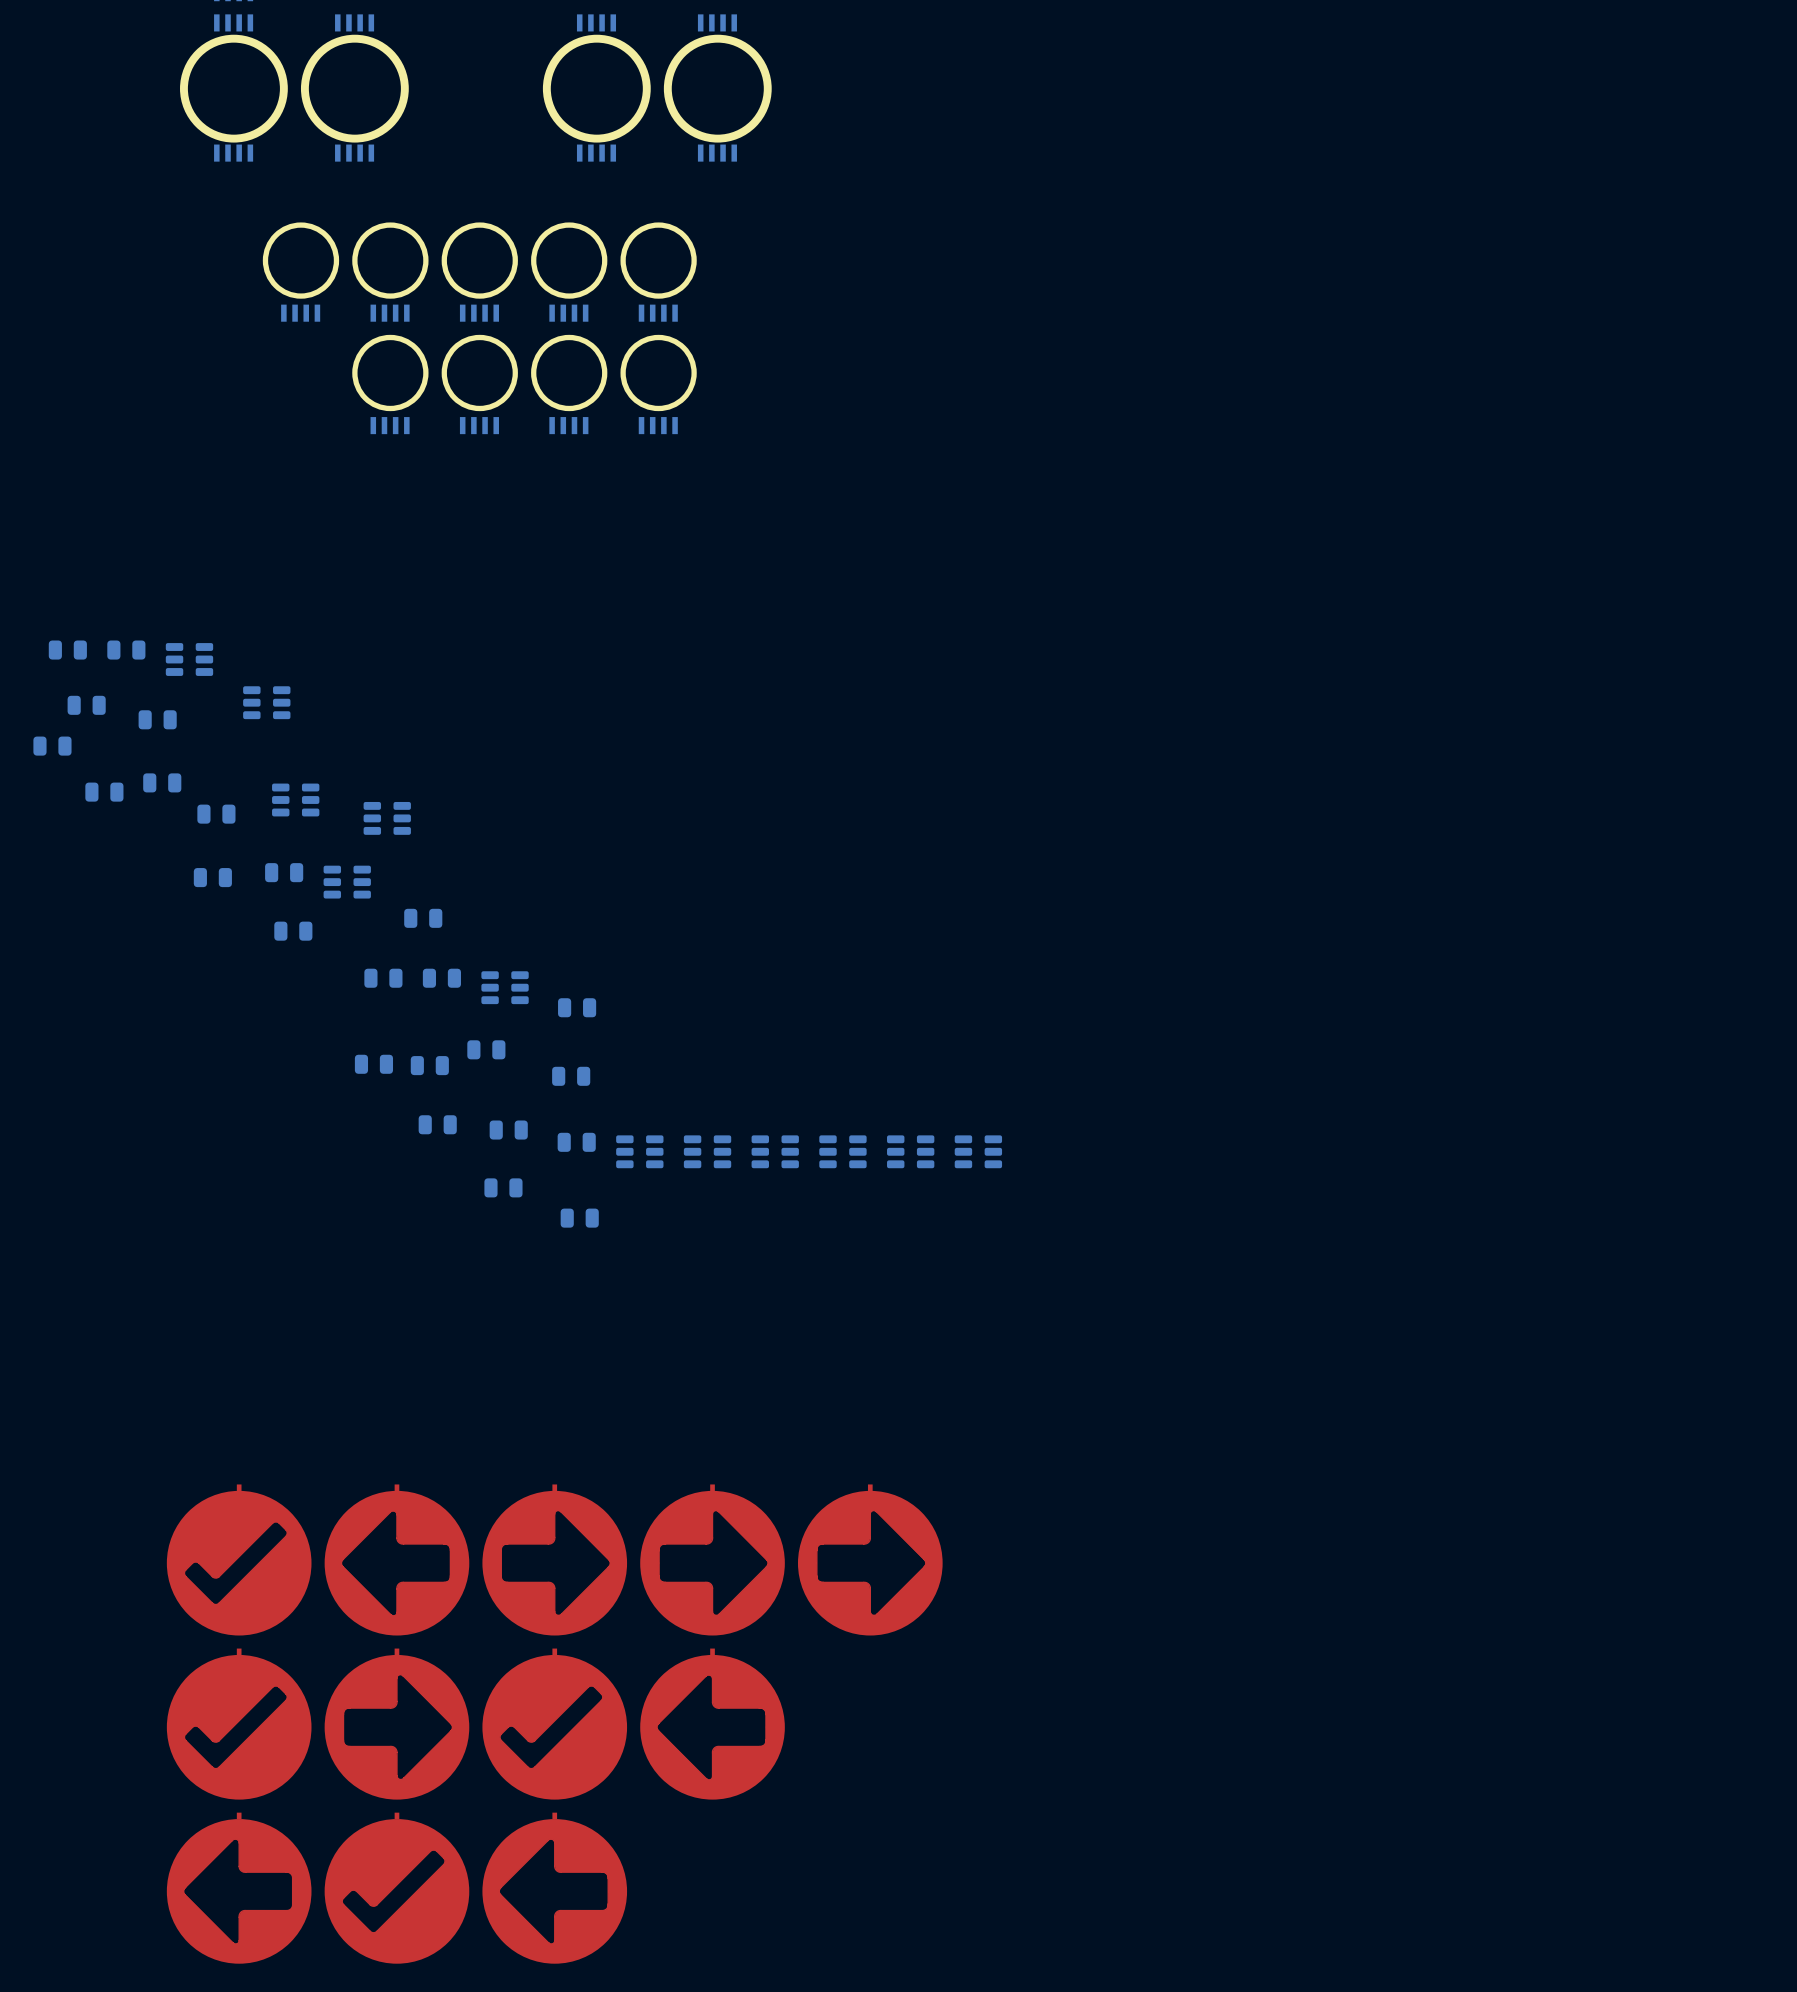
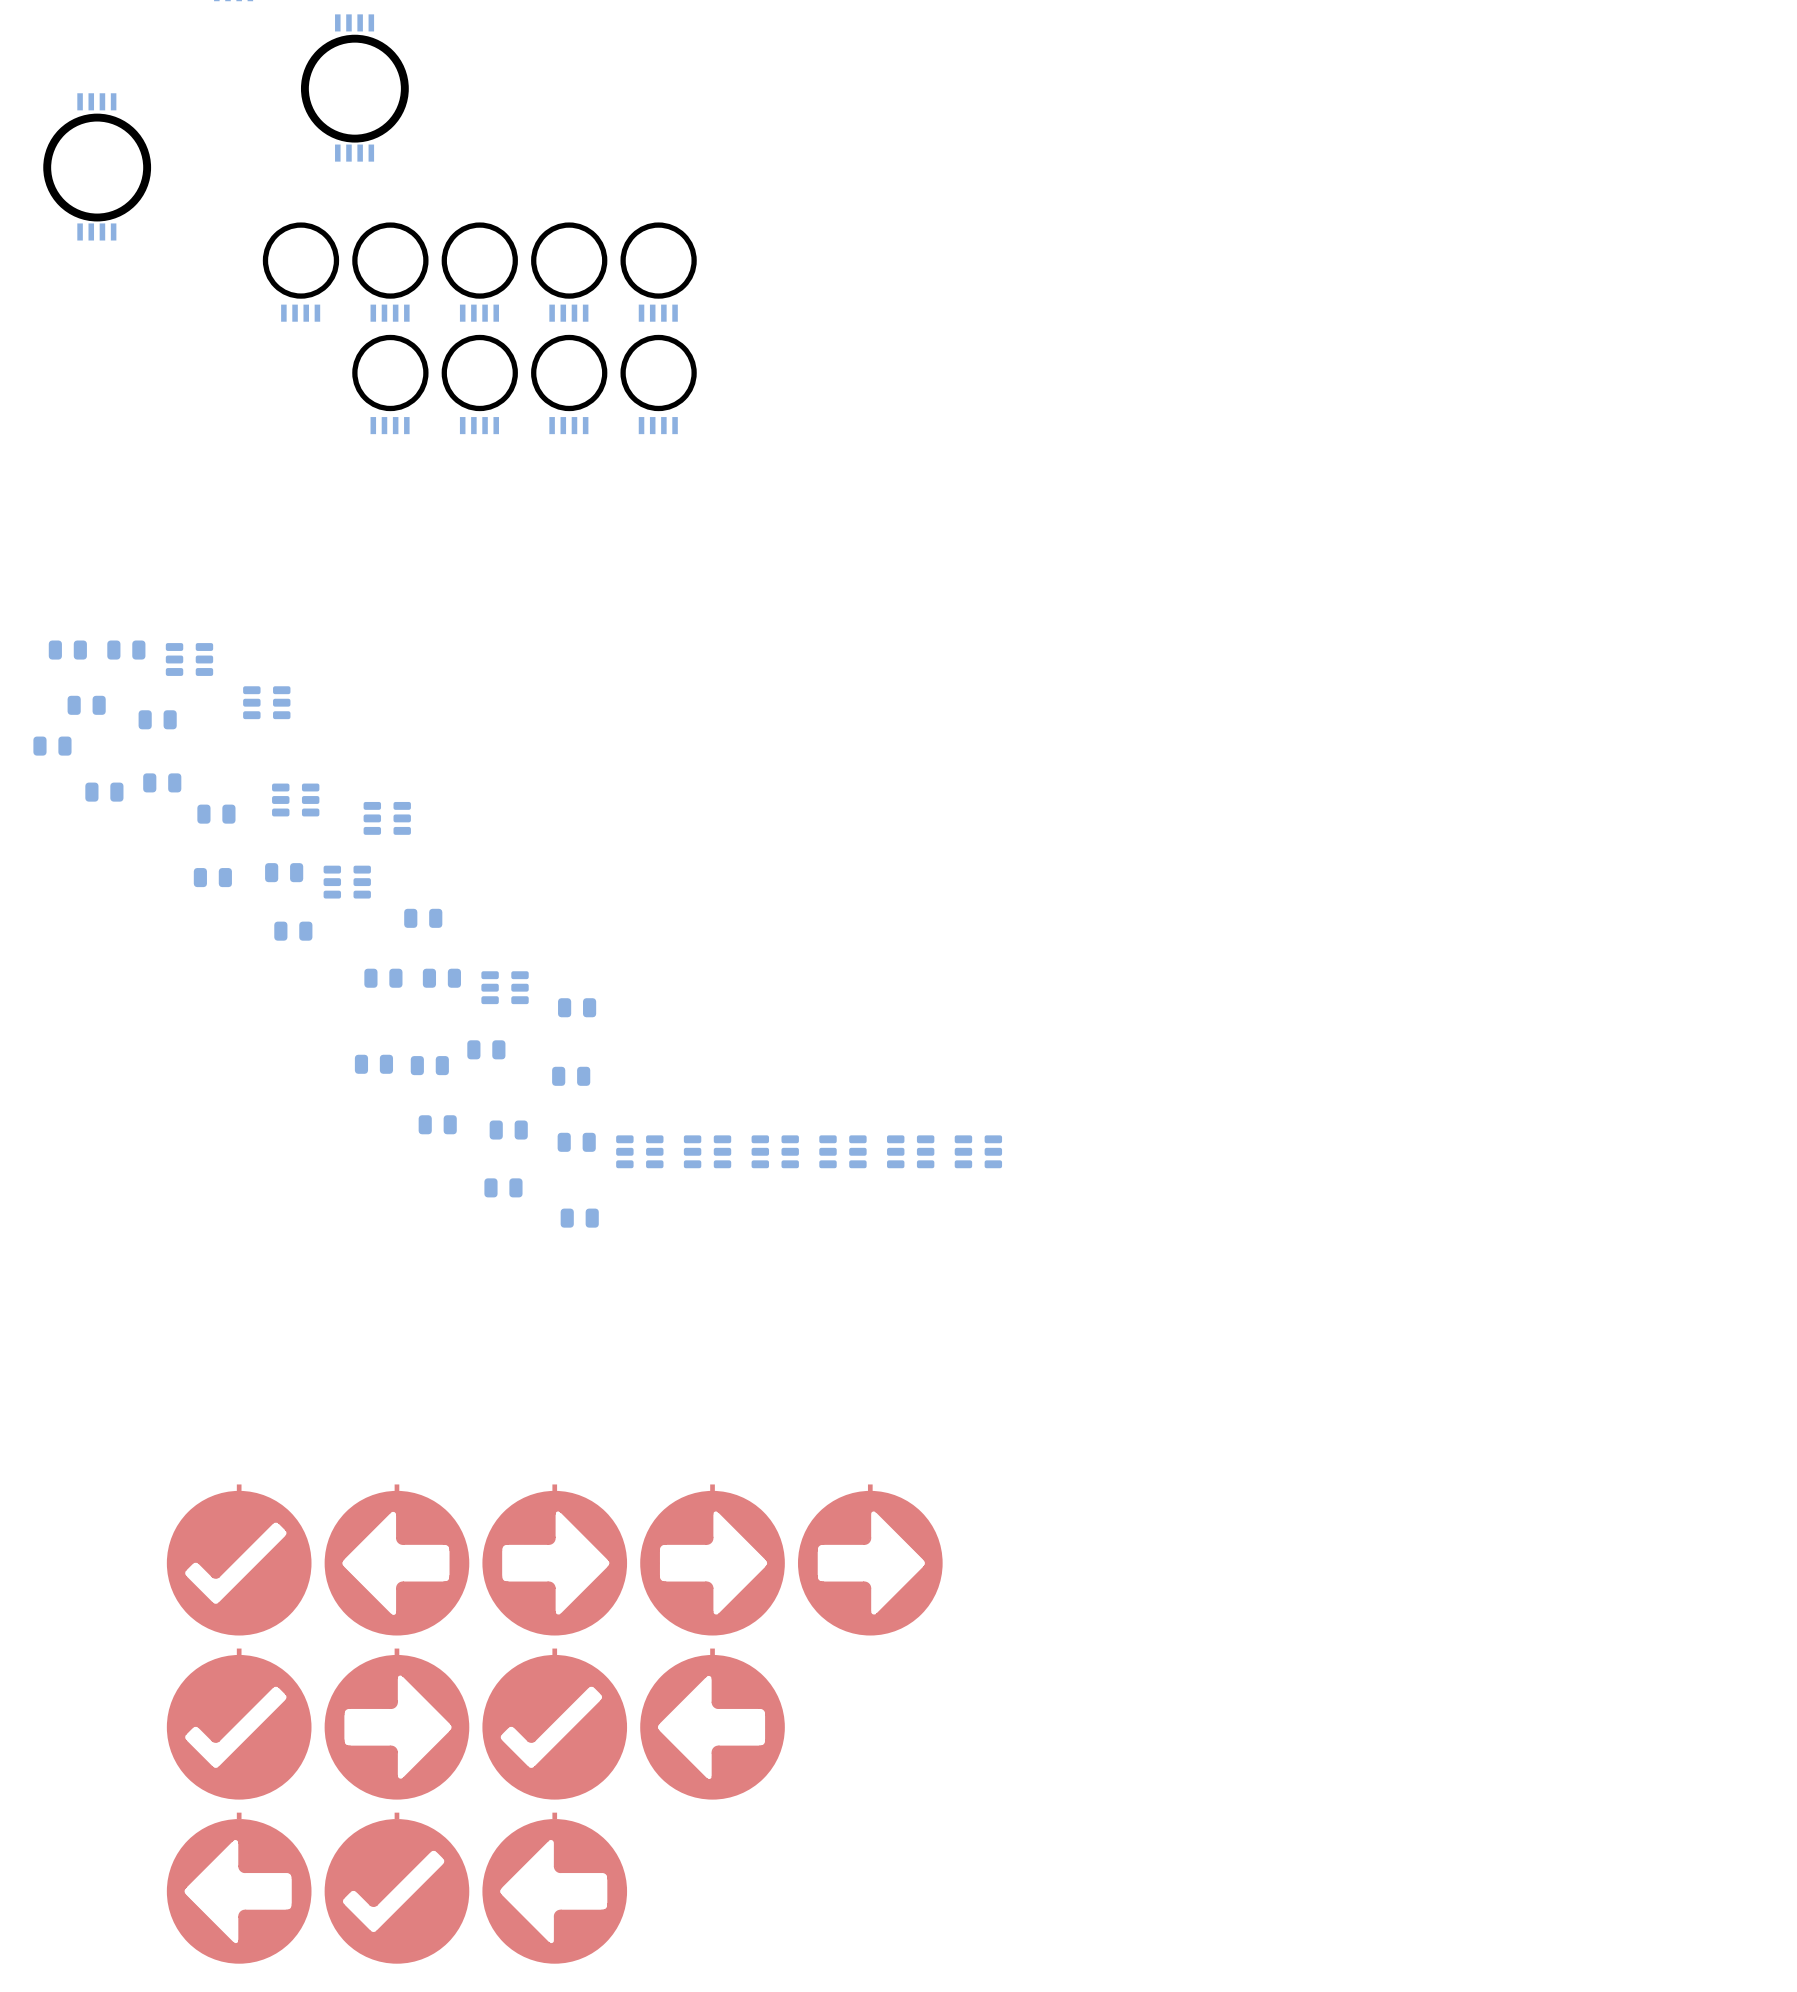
part position: (233, 88) -> (97, 166)
part: (596, 88) -> none
part: (717, 88) -> none

